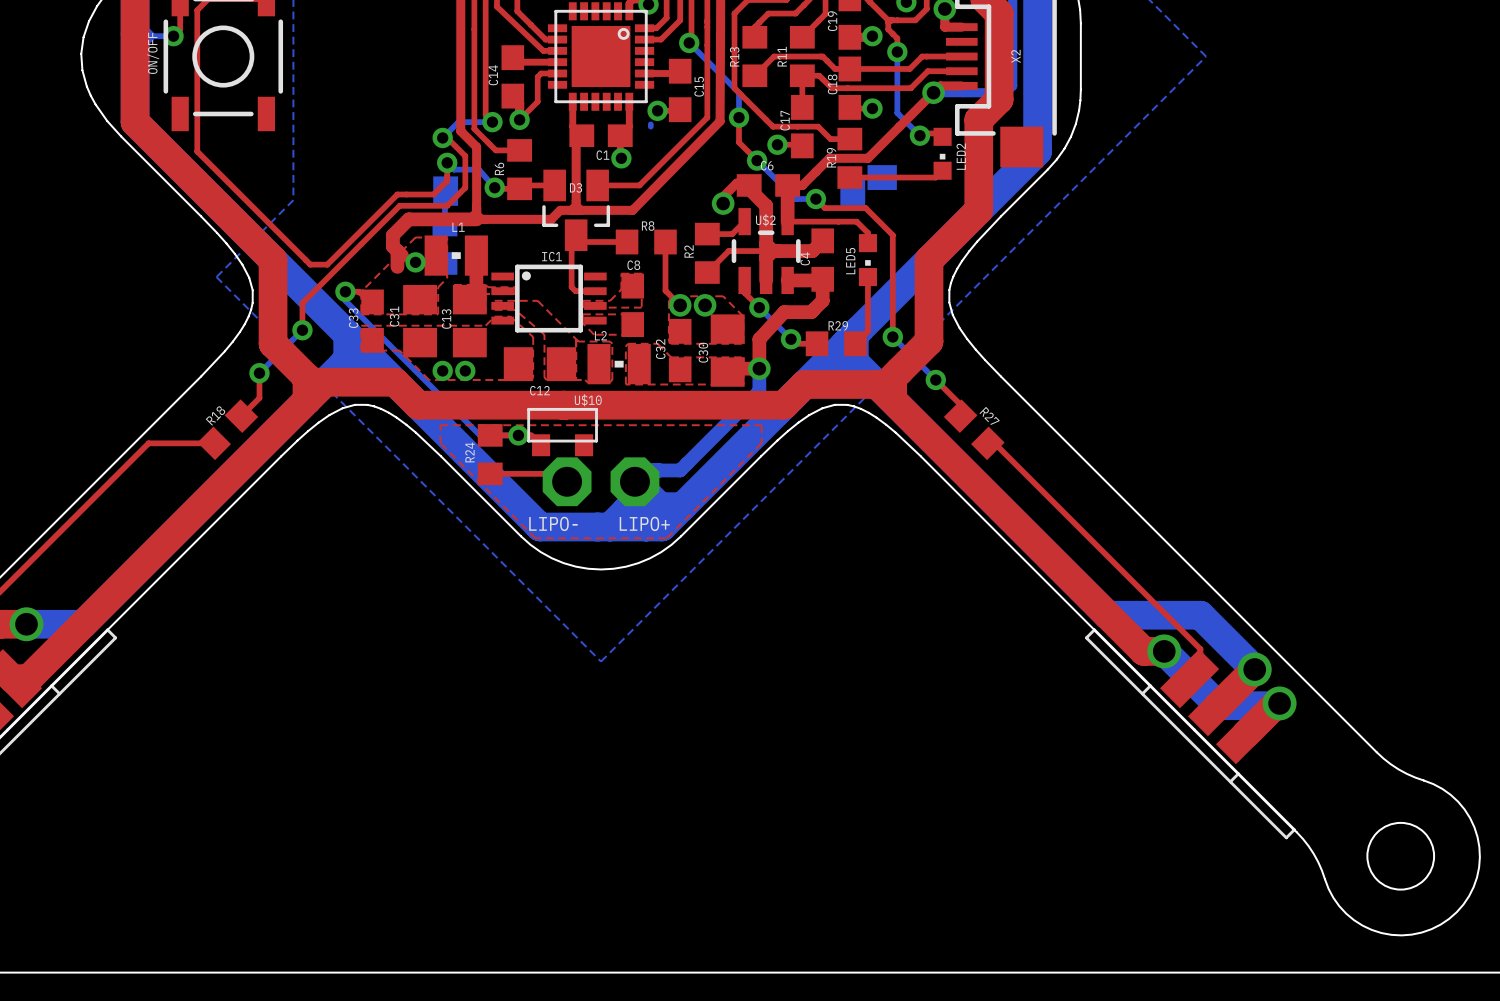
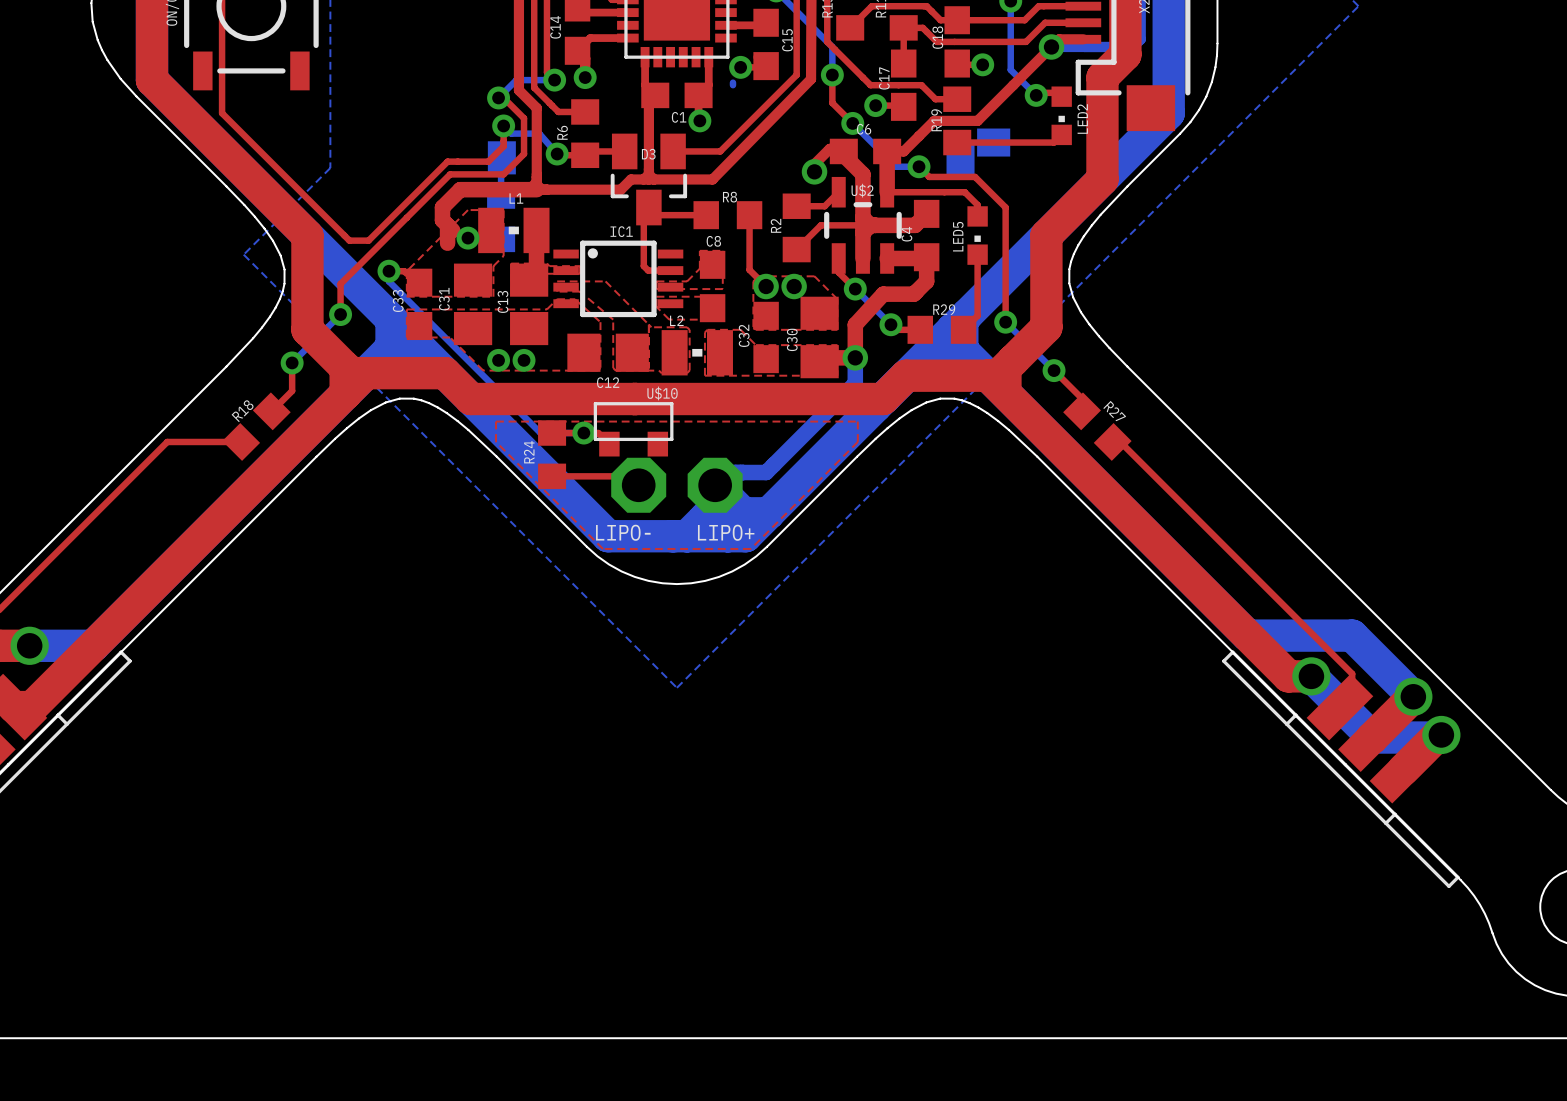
top track: (557, 73) (541, 73) (537, 76) (537, 101) (519, 119) -> none
top track: none -> (627, 38) (590, 38) (577, 50)

